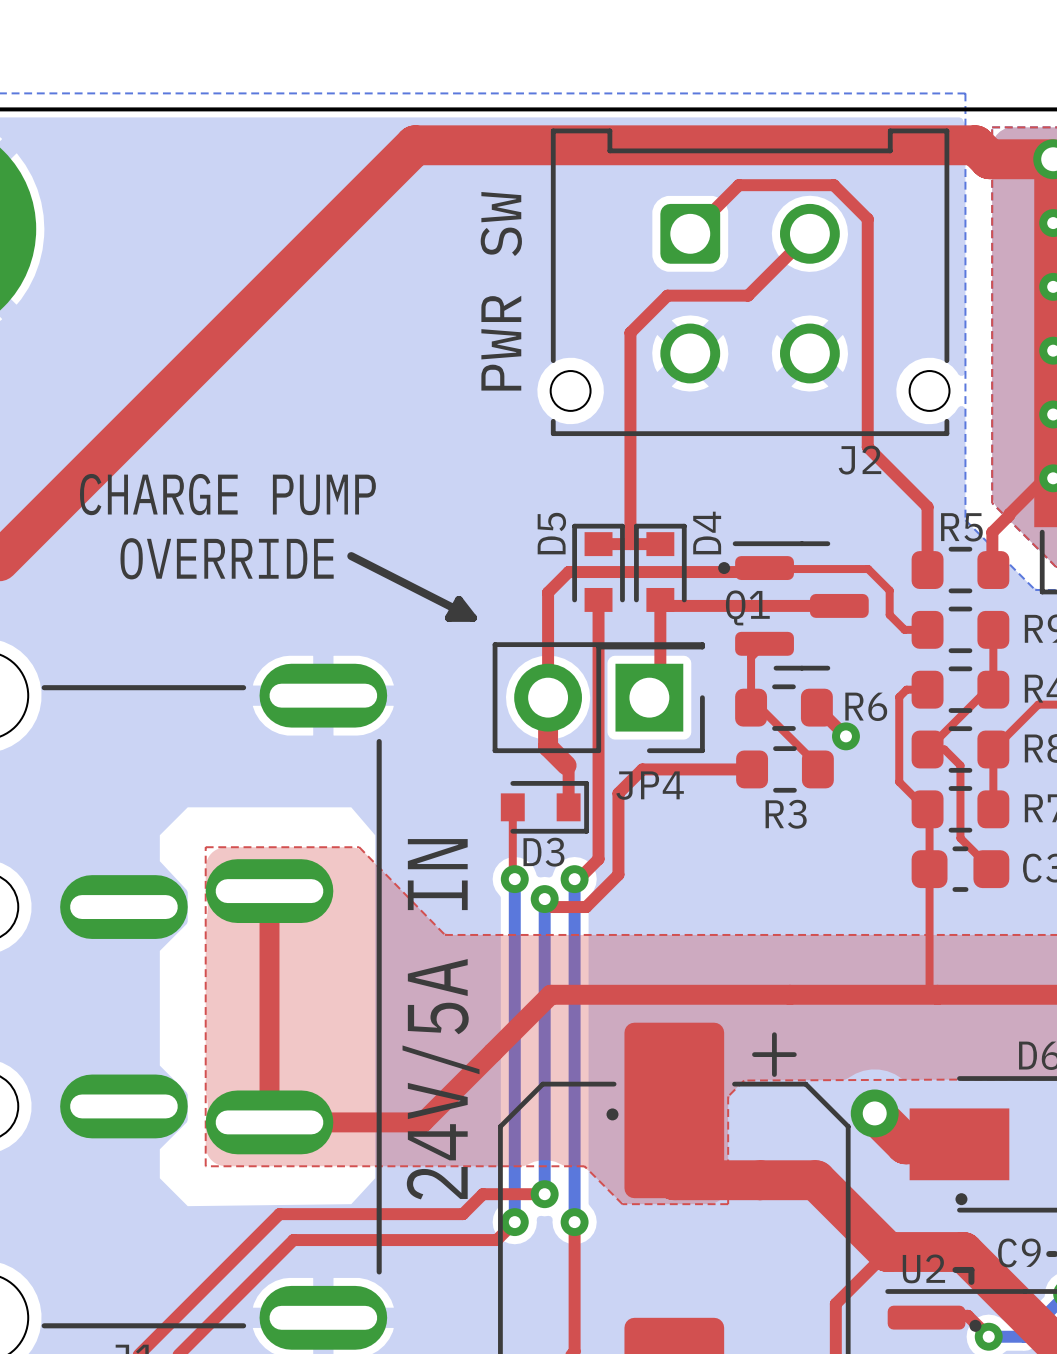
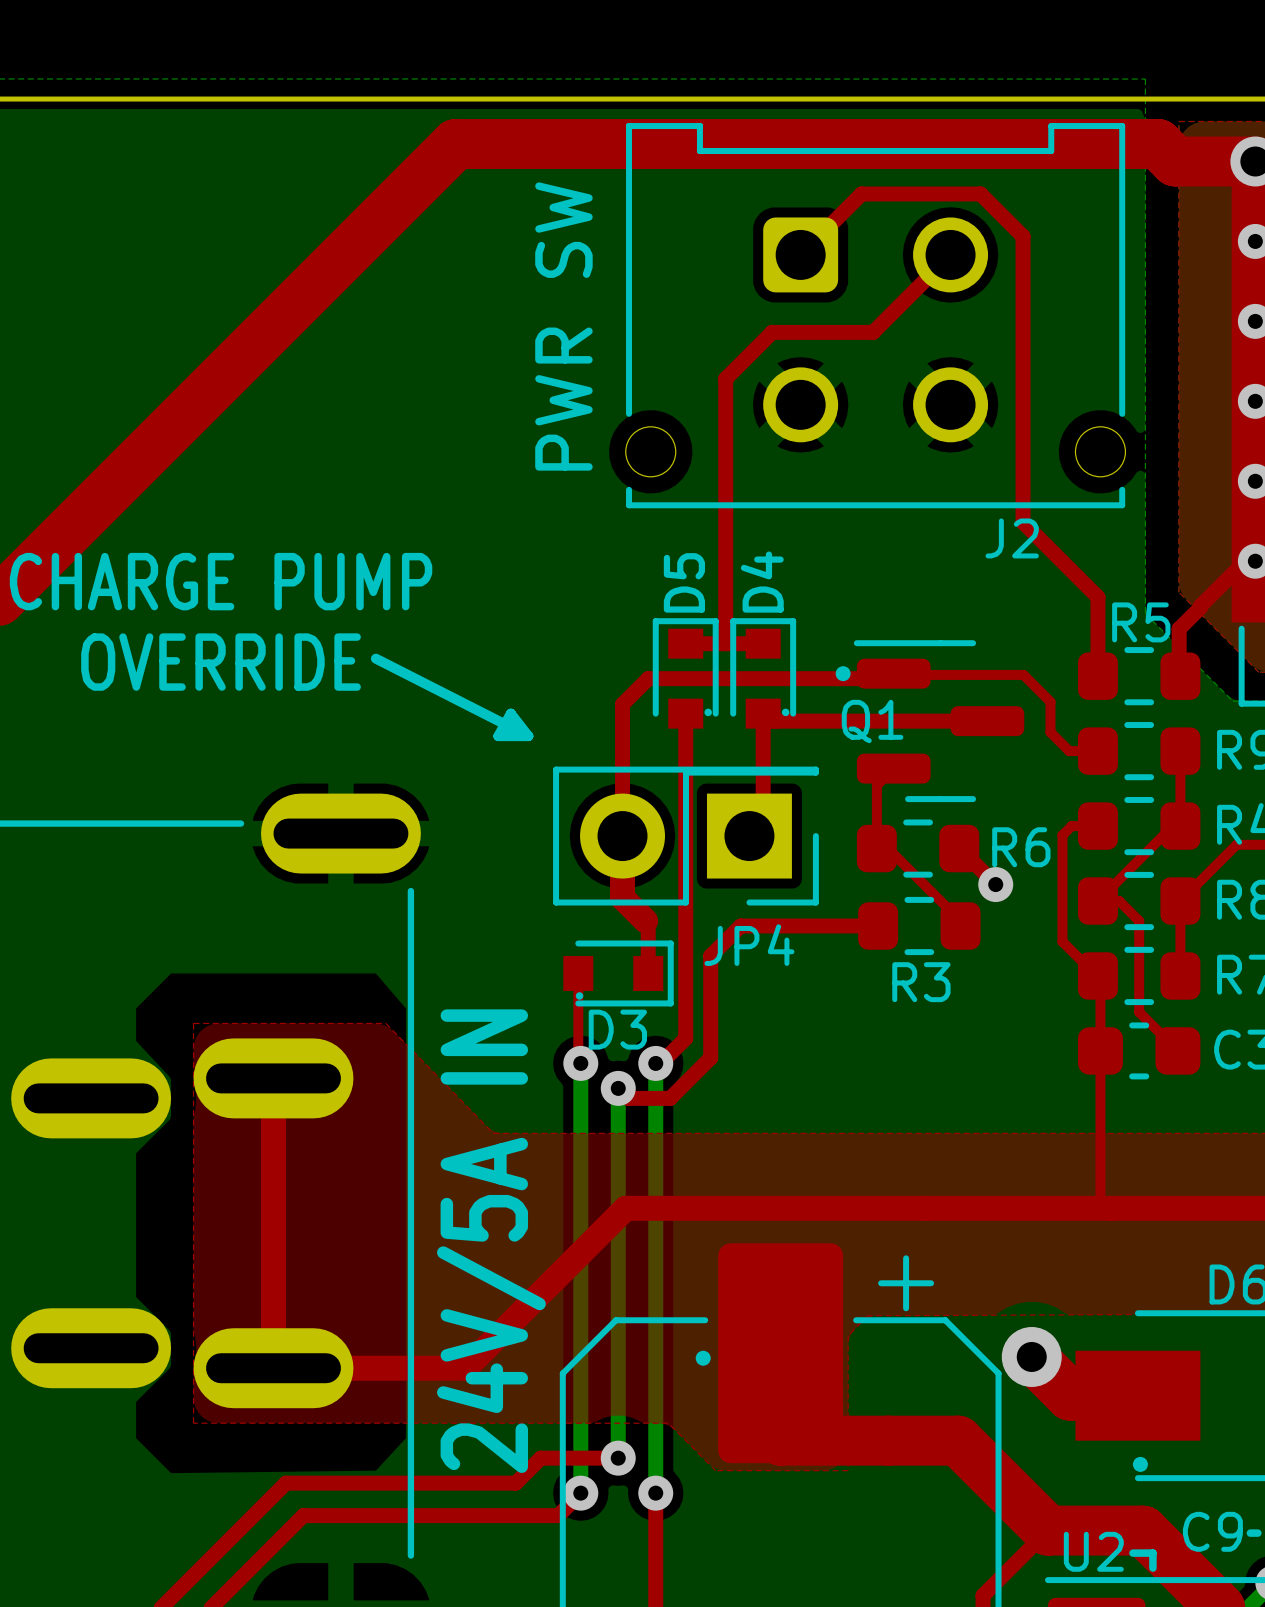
D5 footprint: [572, 523, 625, 612] -> [652, 618, 719, 729]
D4 footprint: [634, 523, 687, 612] -> [730, 618, 797, 729]
D5 name position: D5 (551, 533) -> D5 (684, 582)
D4 name position: D4 (707, 533) -> D4 (762, 582)
D3 footprint: [500, 781, 589, 834] -> [563, 940, 674, 1007]

